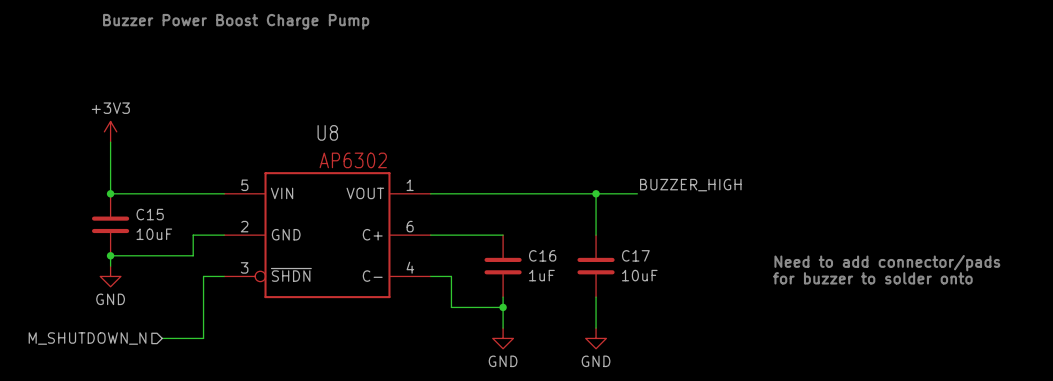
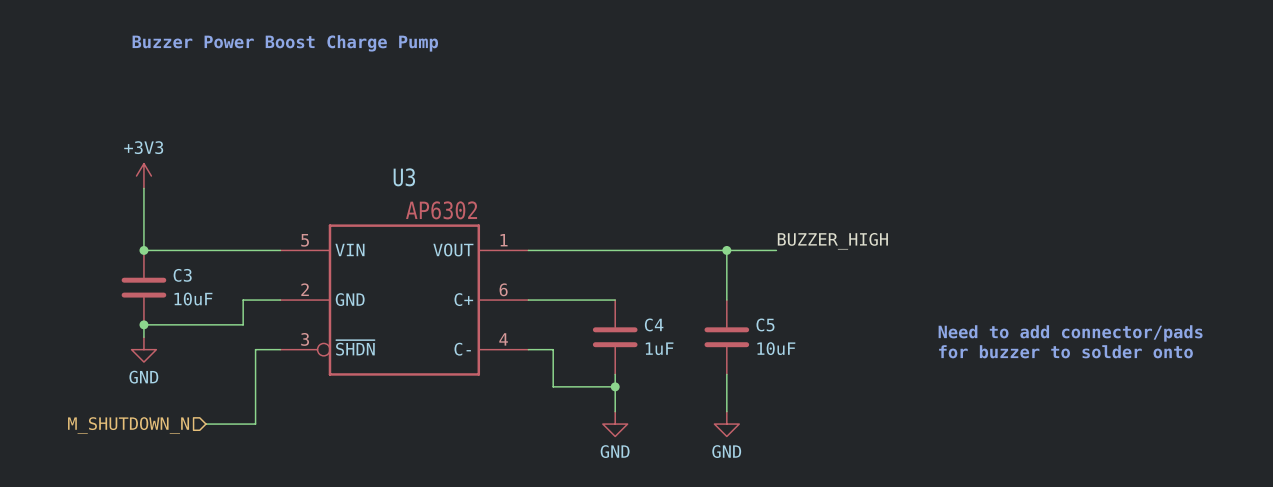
U8 name: U8 (327, 132) -> U3 (404, 177)
C15 name: C15 (150, 214) -> C3 (182, 275)
C16 name: C16 (542, 255) -> C4 (654, 324)
C17 name: C17 (635, 255) -> C5 (765, 324)

